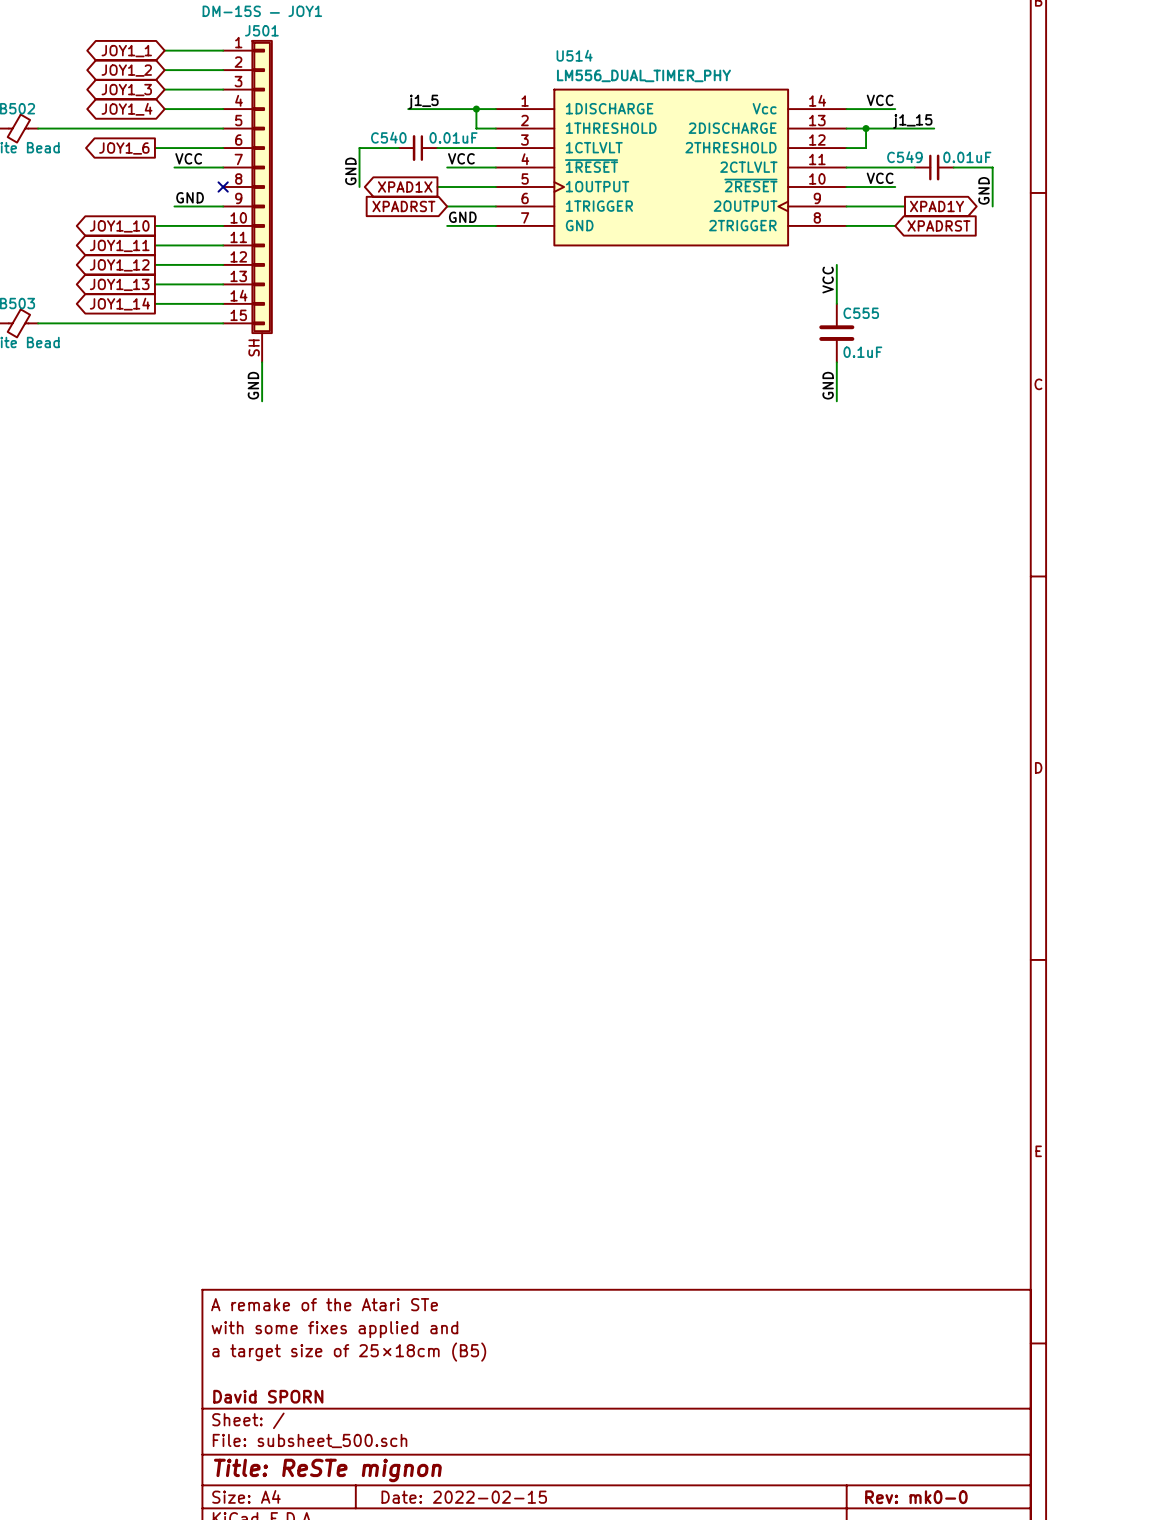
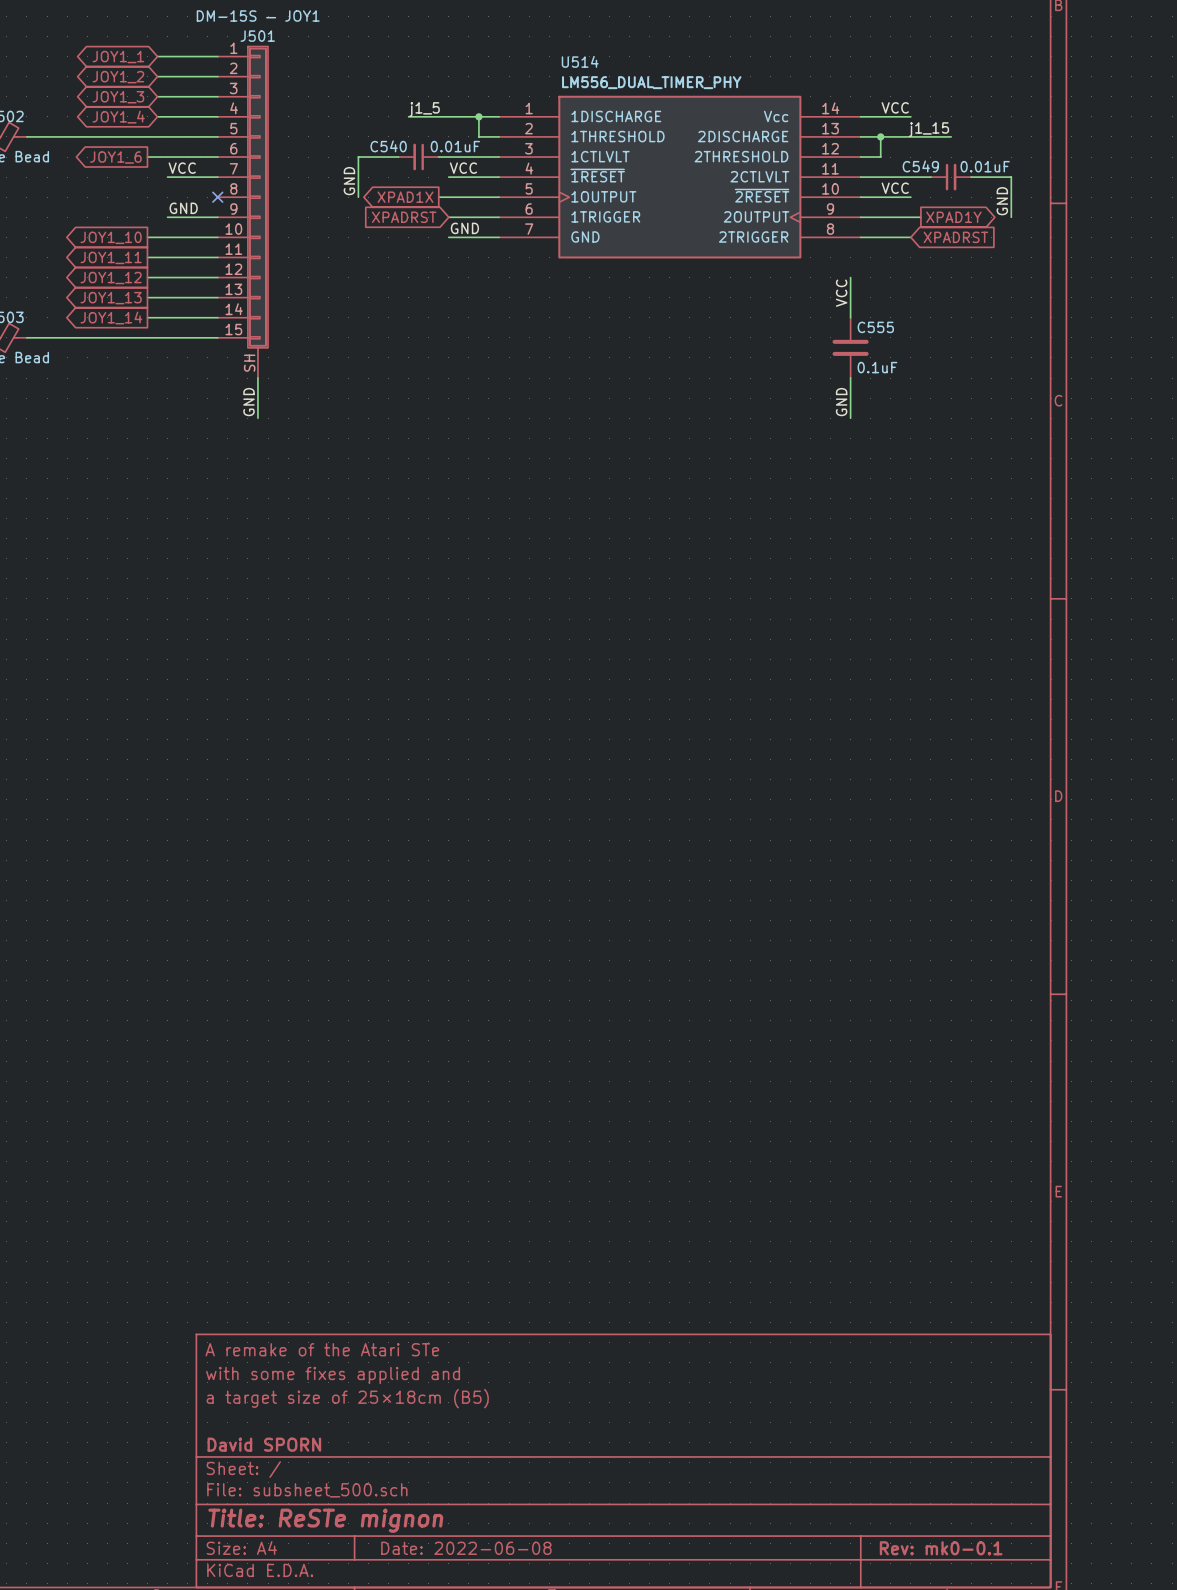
title block: Date: 2022-02-15 (464, 1497) -> Date: 2022-06-08 (466, 1548)
title block: Rev: mk0-0 (916, 1497) -> Rev: mk0-0.1 (941, 1548)

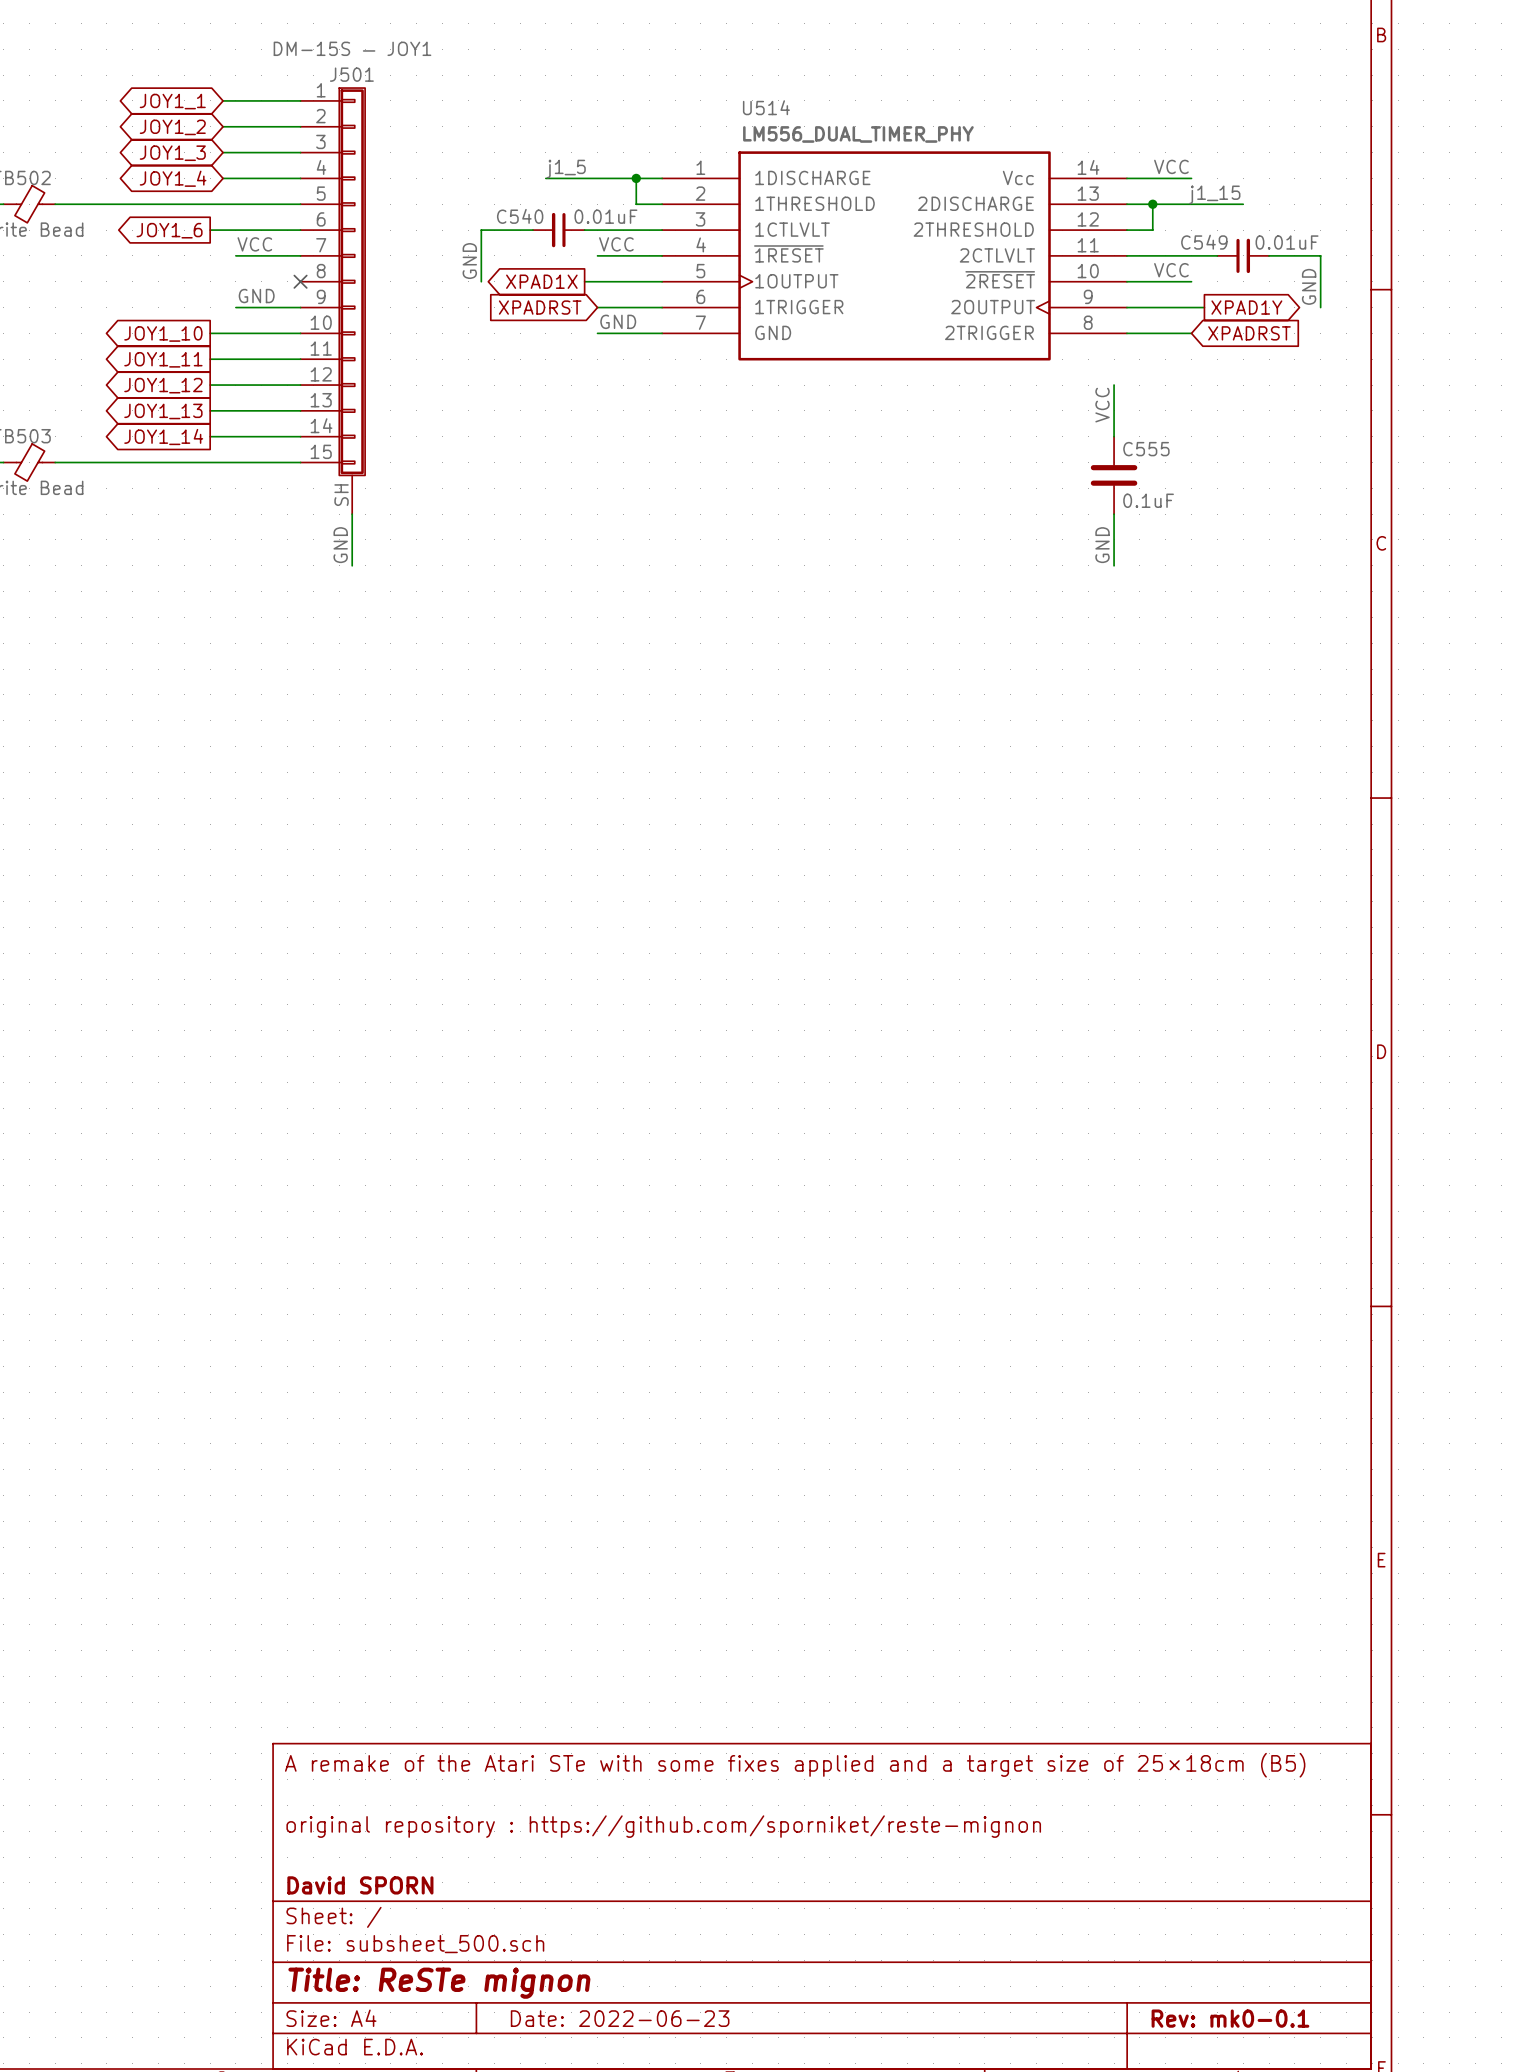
title block: A remake of the Atari STe (322, 1349) -> A remake of the Atari STe with some fixes applied and a target size of 25×18cm (B5) (795, 1765)
title block: with some fixes applied and (333, 1375) -> none
title block: a target size of 25×18cm (B5) (347, 1398) -> original repository : https://github.com/sporniket/reste-mignon (663, 1826)
title block: Date: 2022-06-08 (466, 1548) -> Date: 2022-06-23 (620, 2018)

